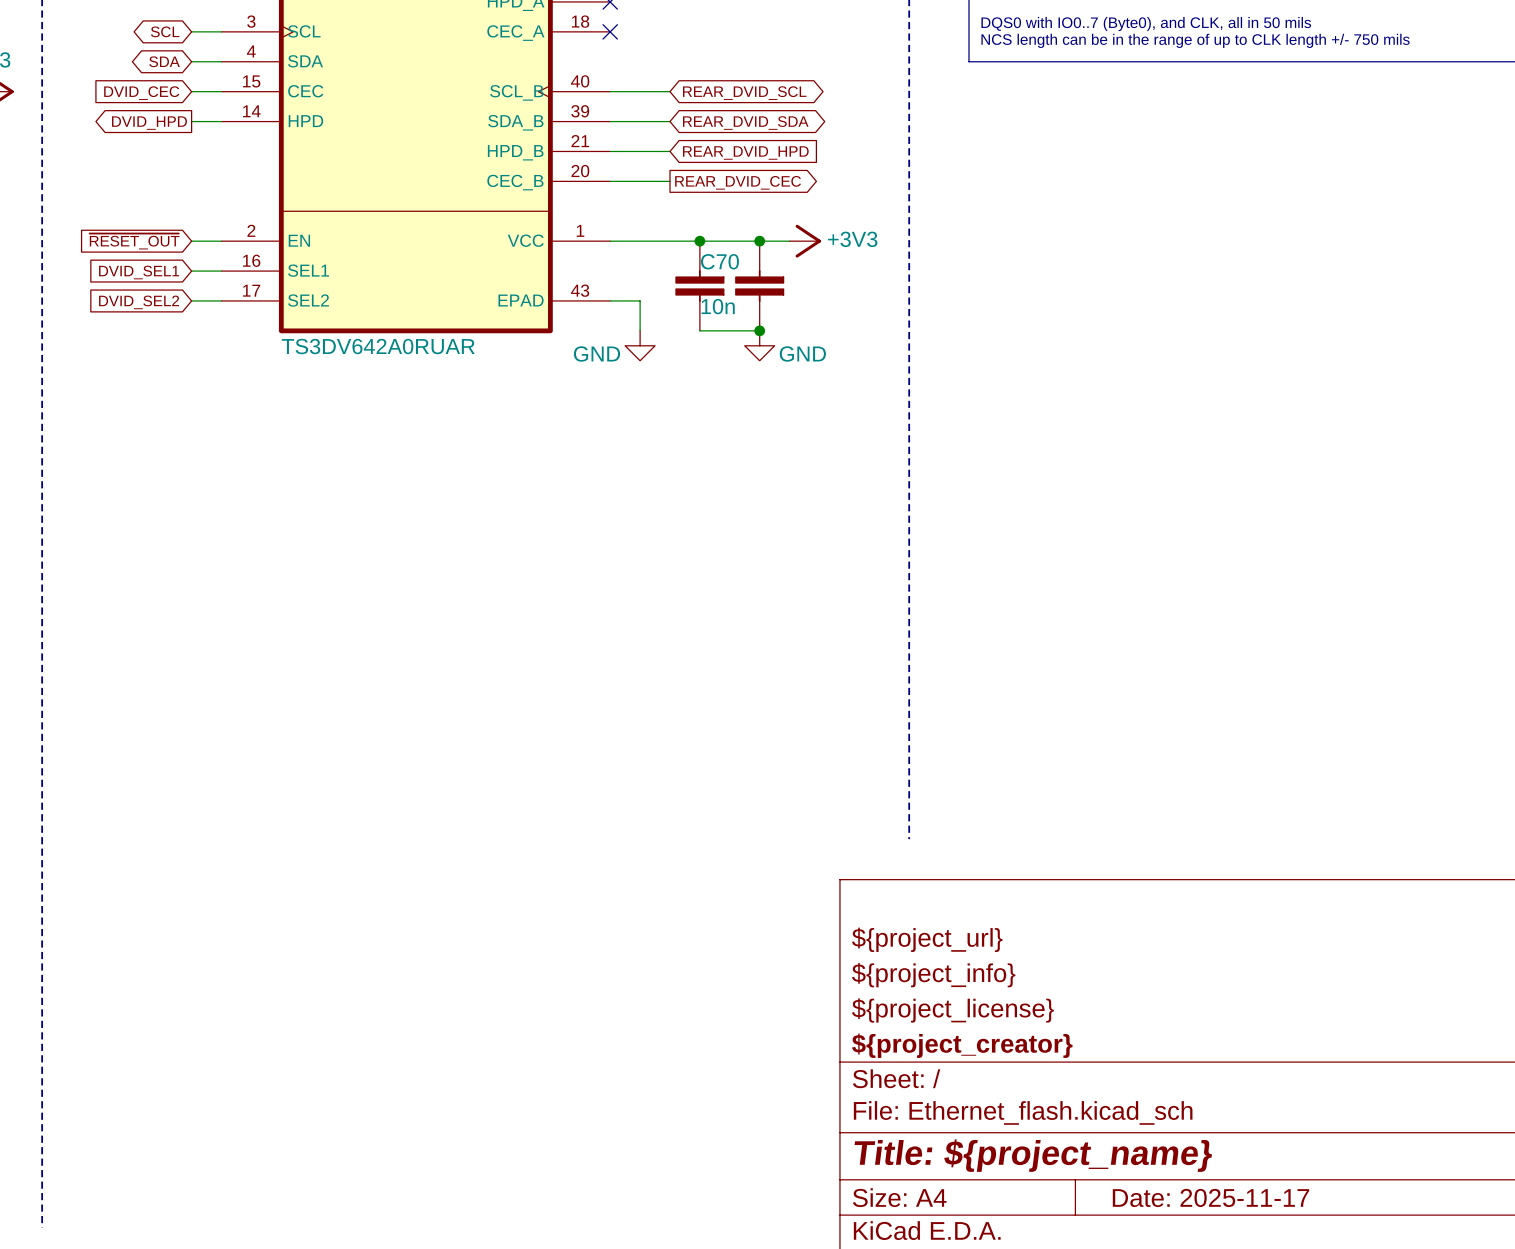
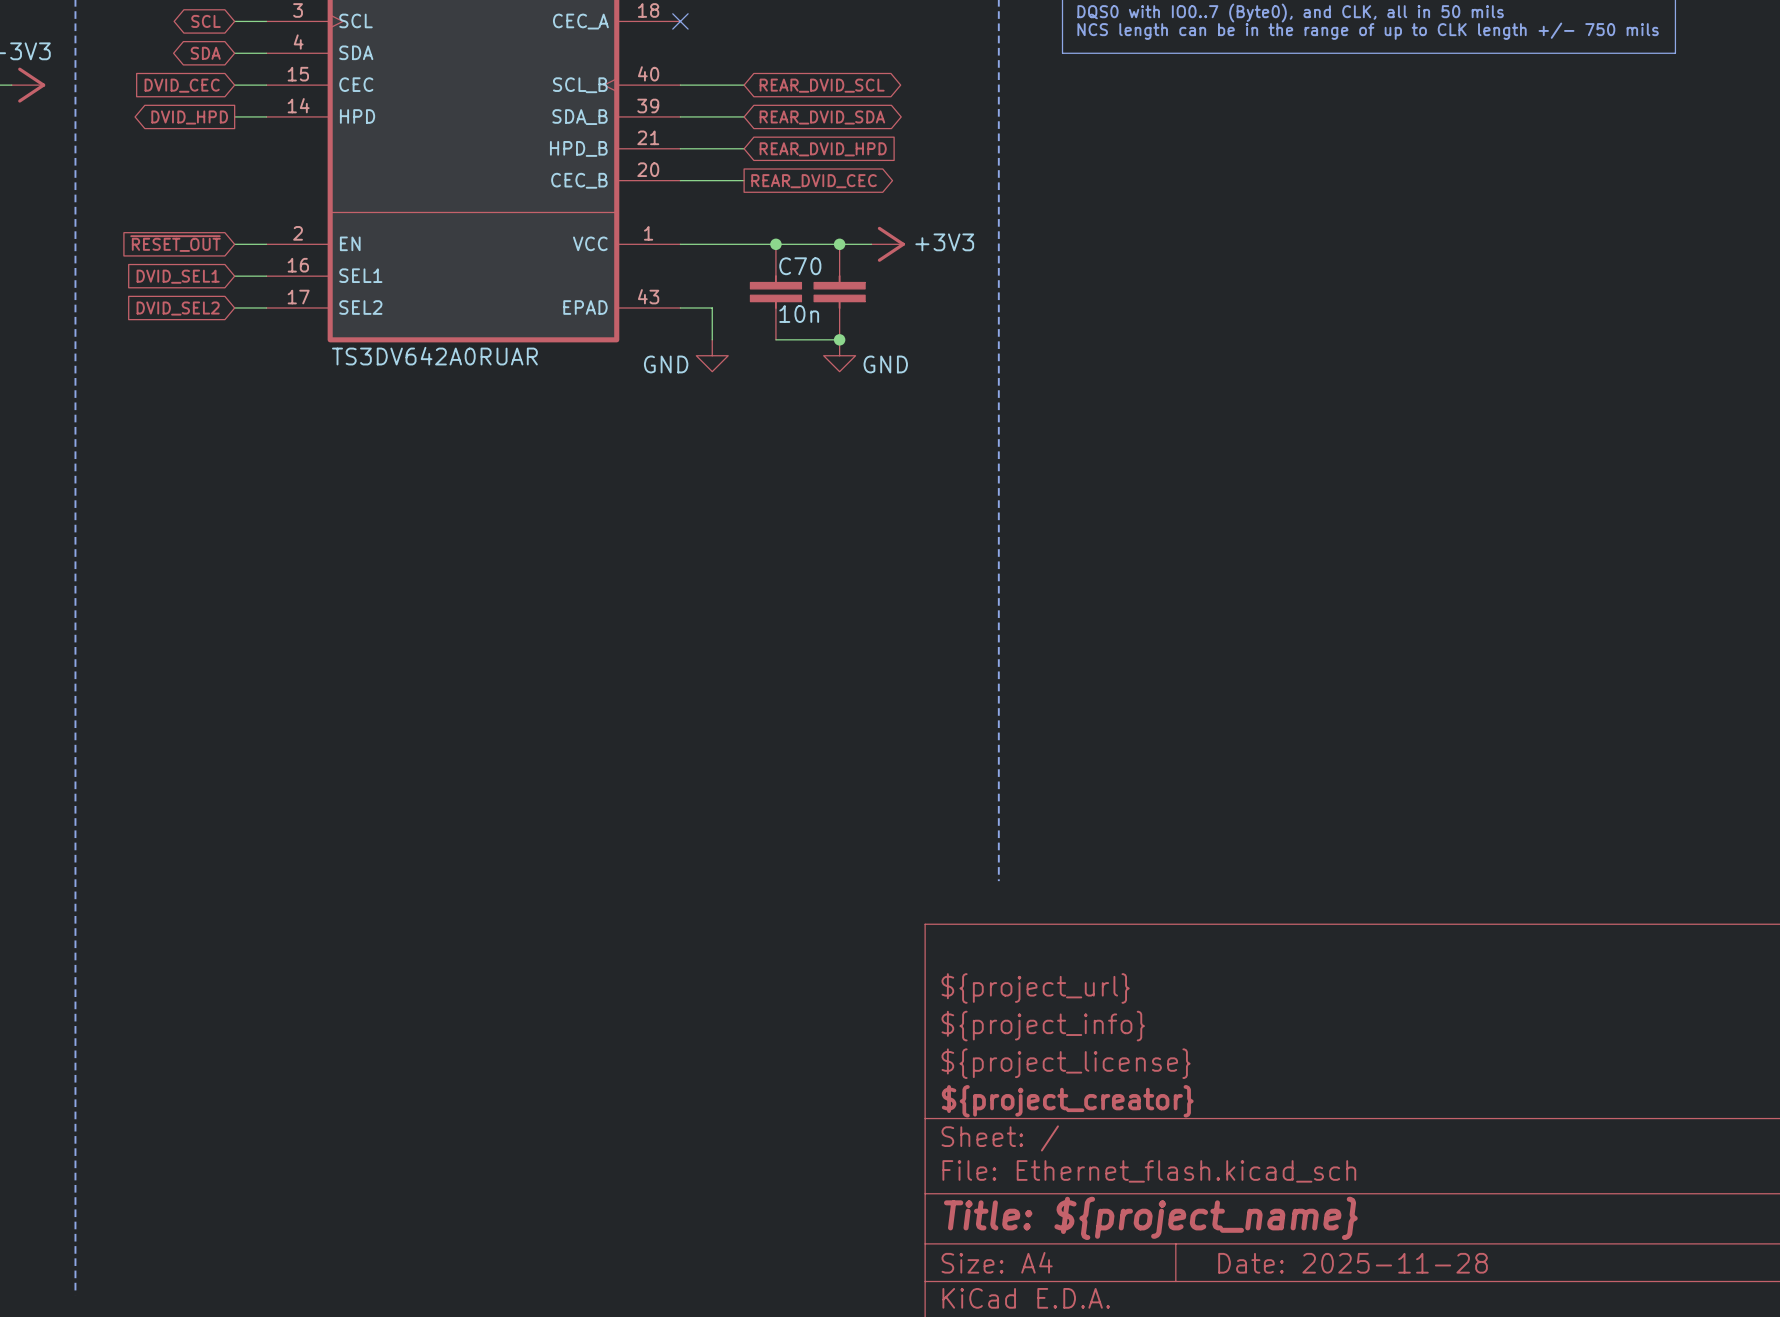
title block: Date: 2025-11-17 (1210, 1197) -> Date: 2025-11-28 (1353, 1263)

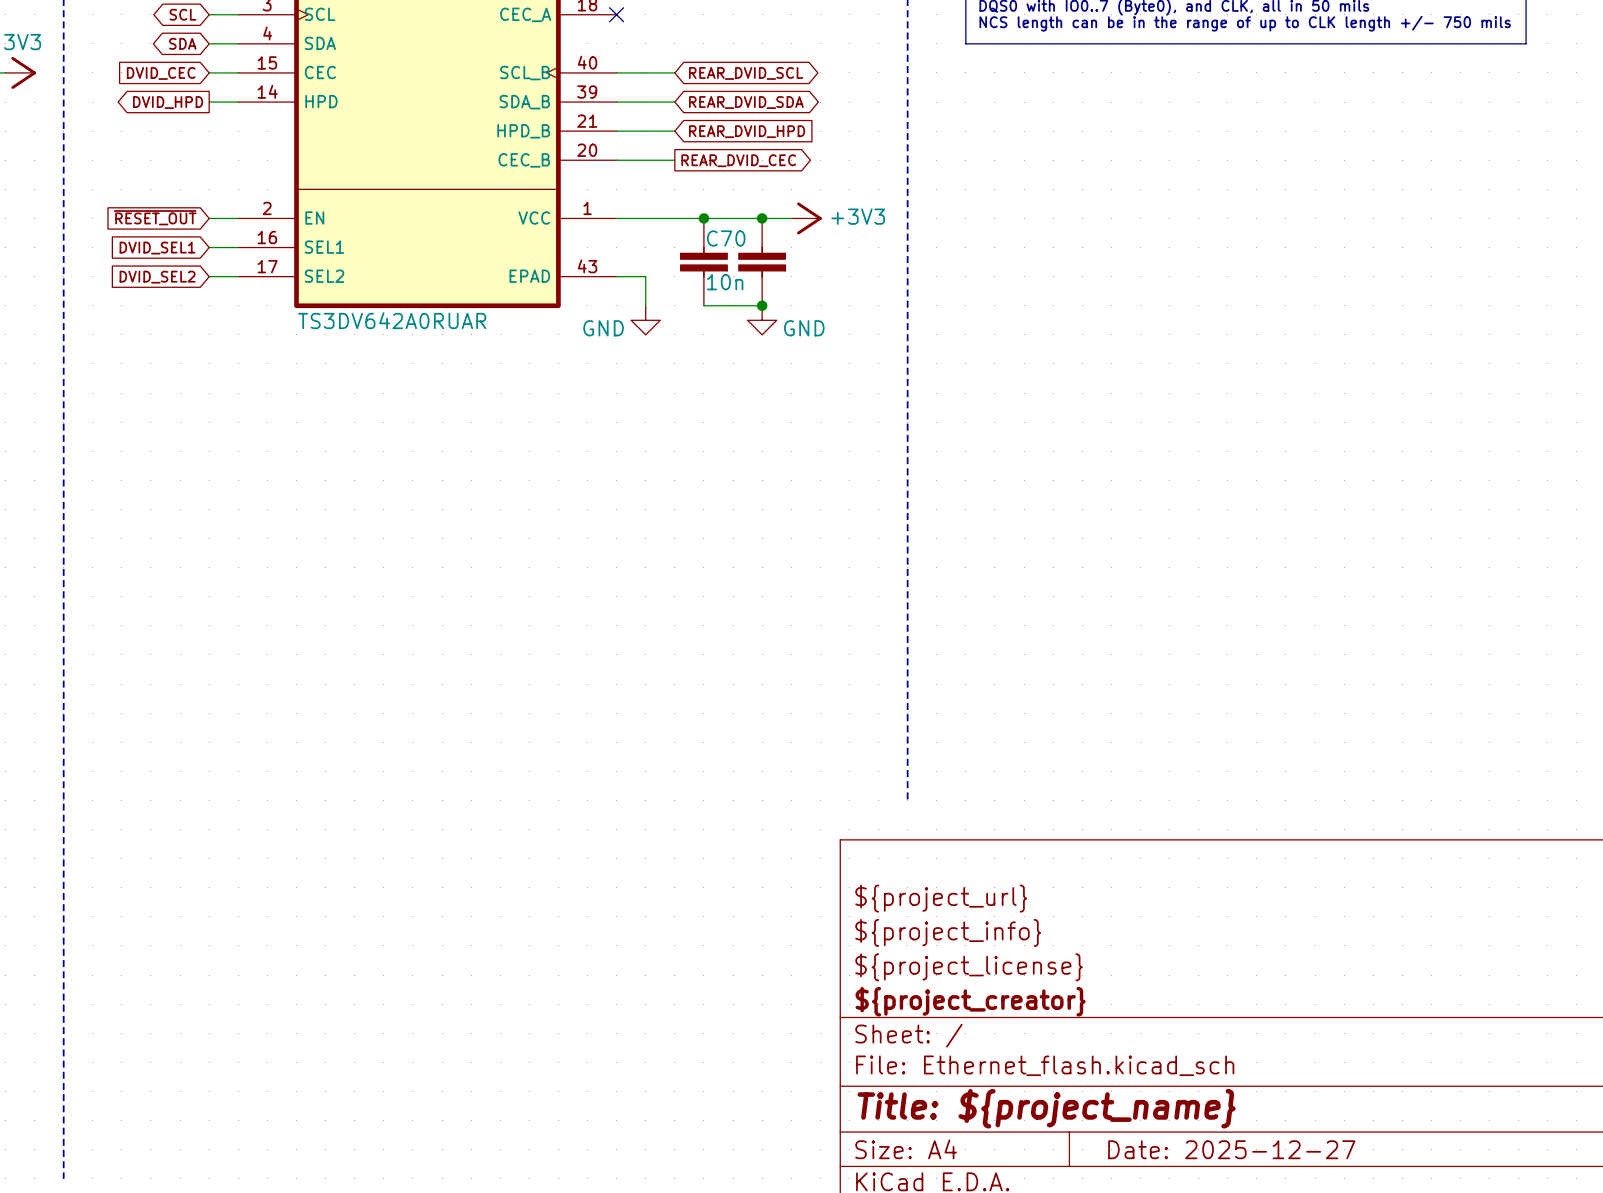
title block: Date: 2025-11-28 (1353, 1263) -> Date: 2025-12-27 (1231, 1149)

